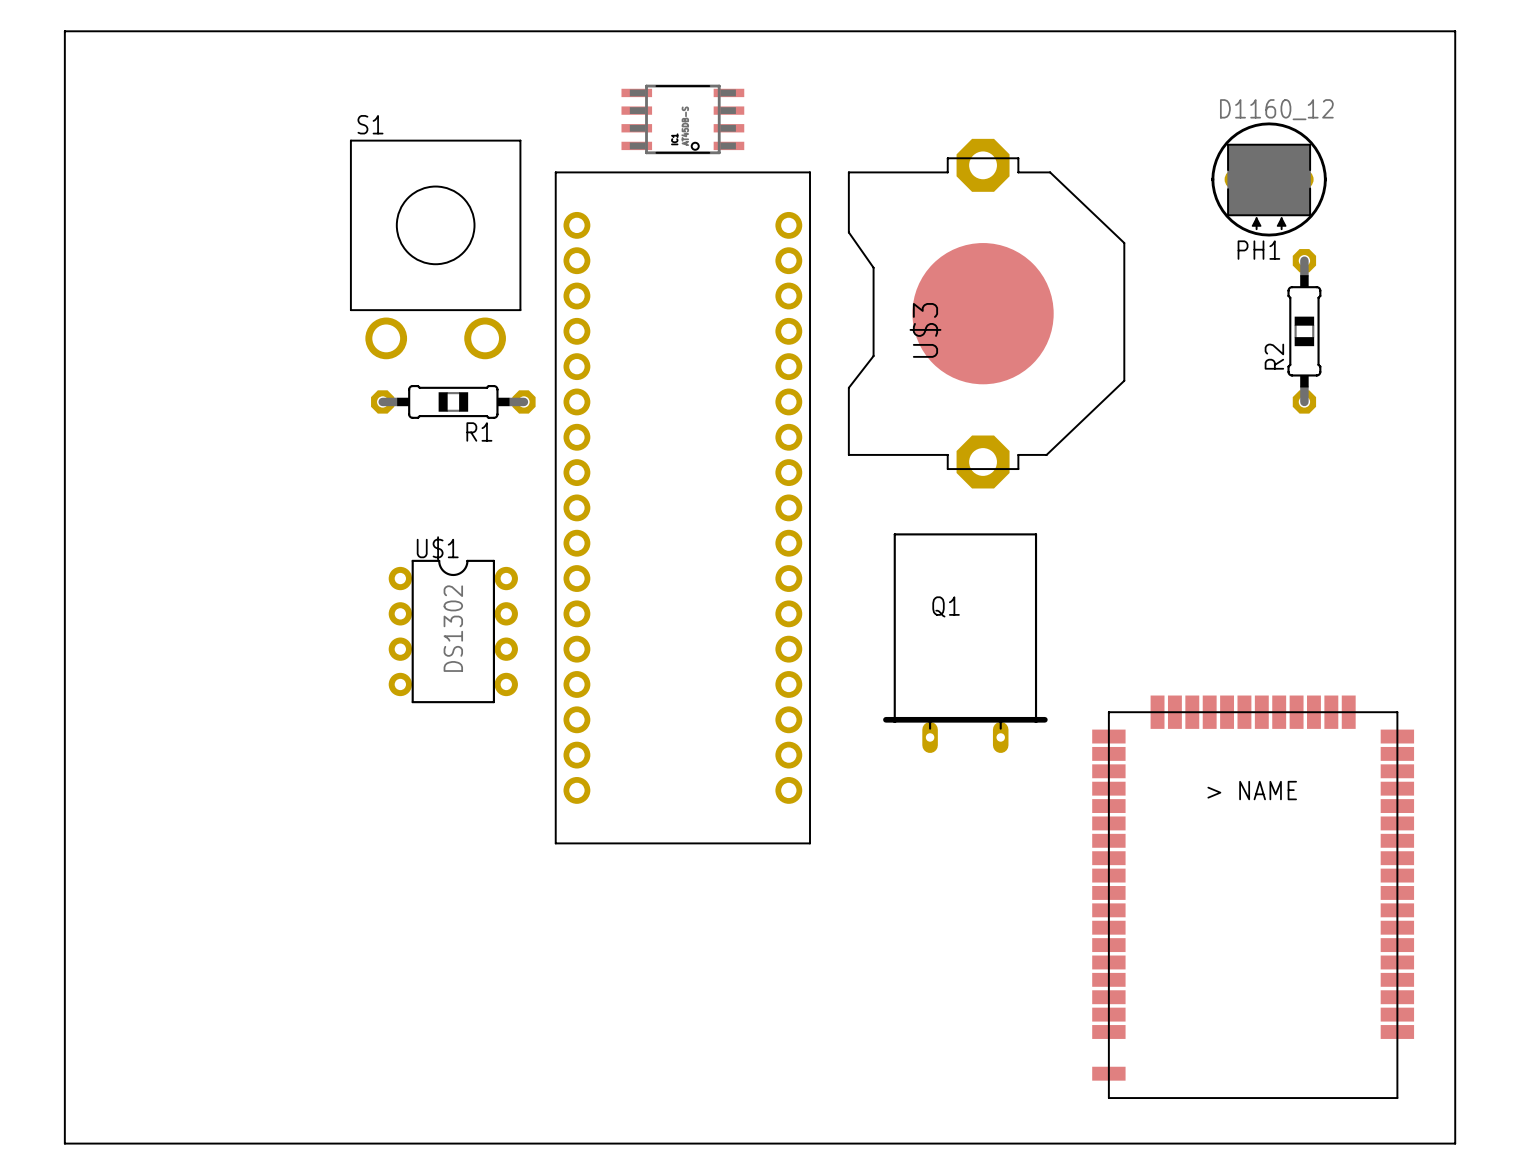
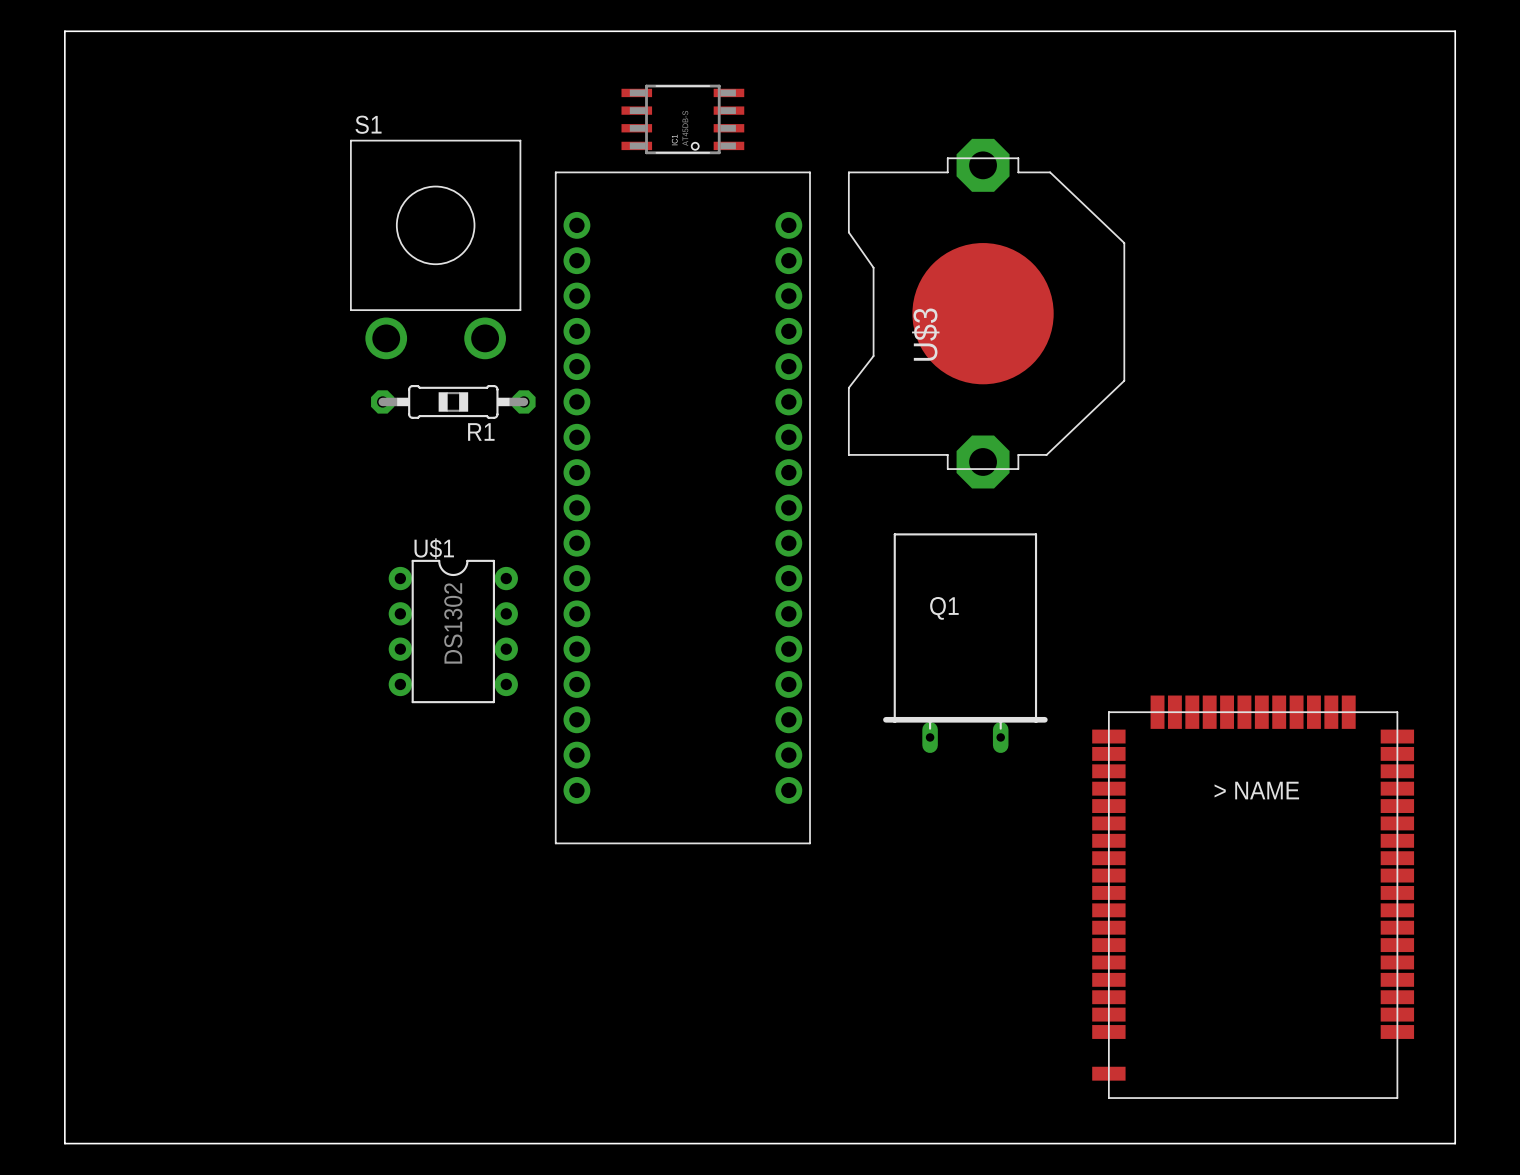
PH1: D1160_12 (1269, 179) -> none
R2: (1304, 331) -> none

